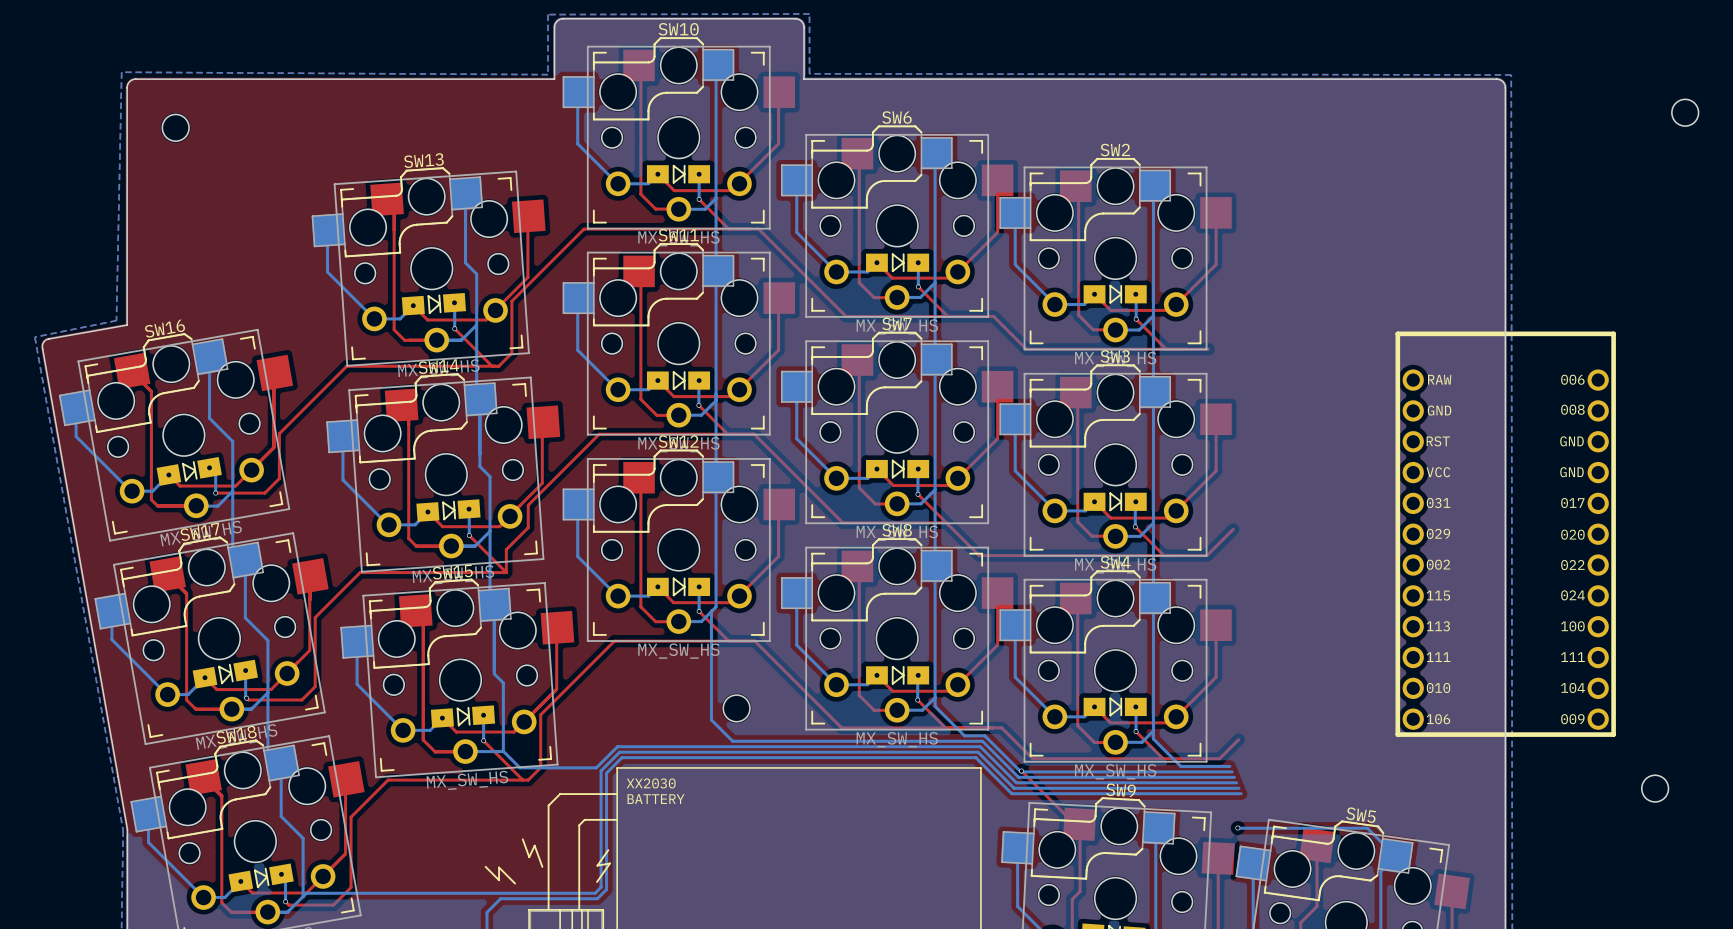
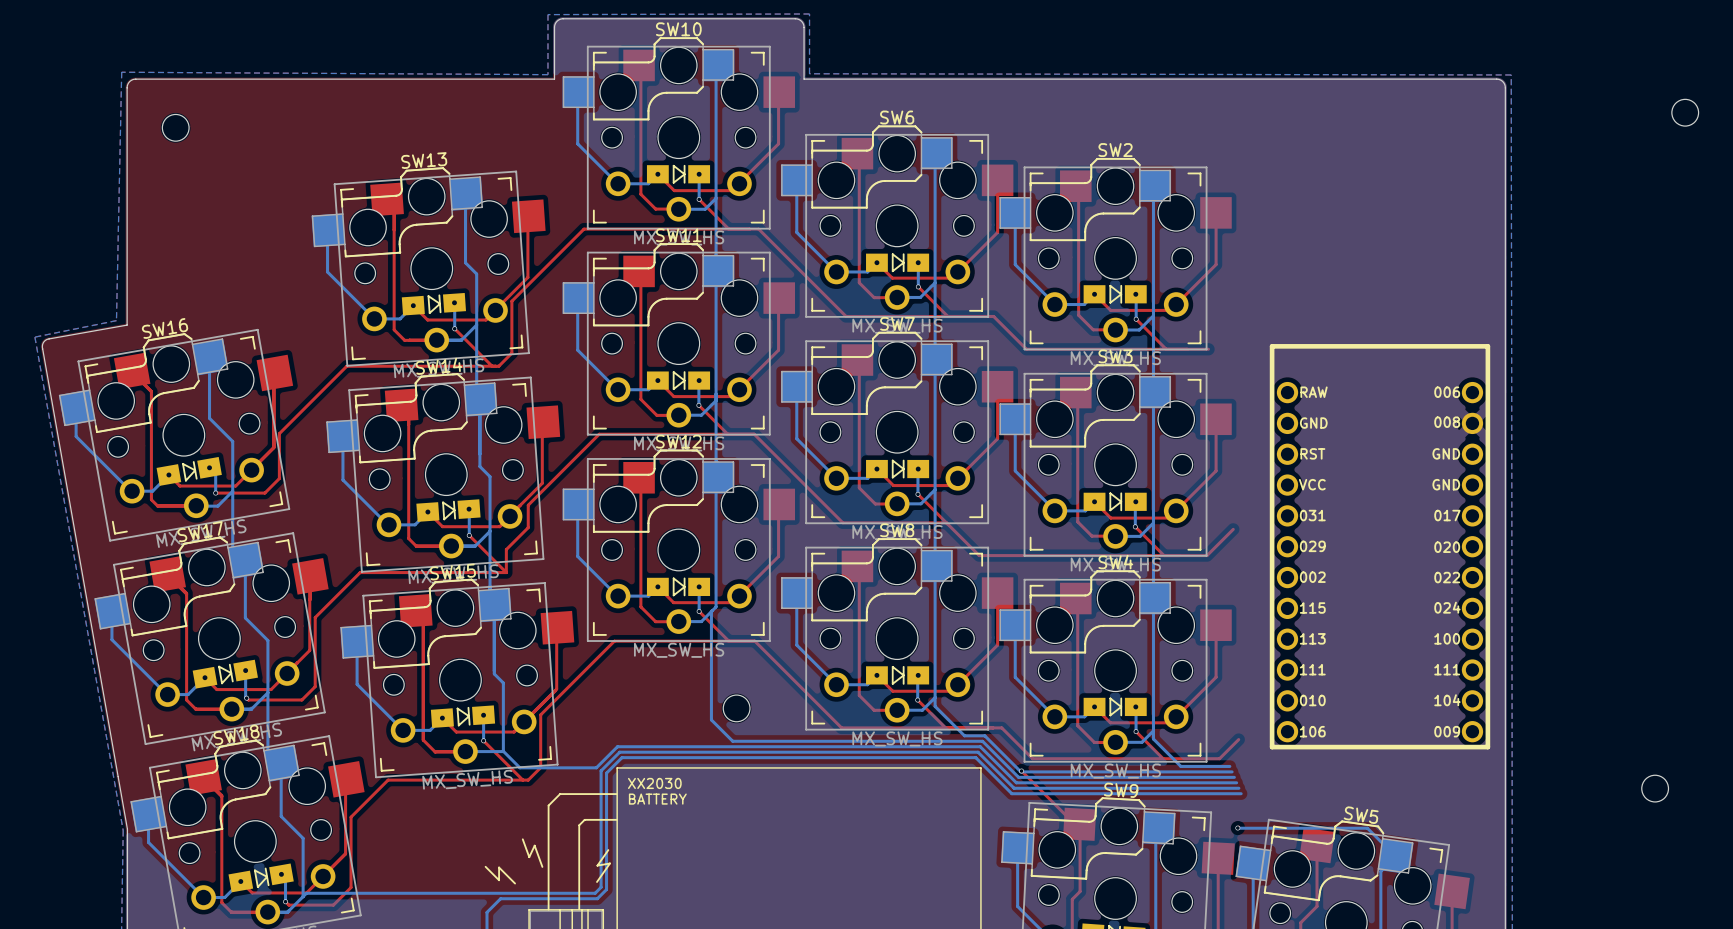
part position: (1505, 534) -> (1379, 546)

